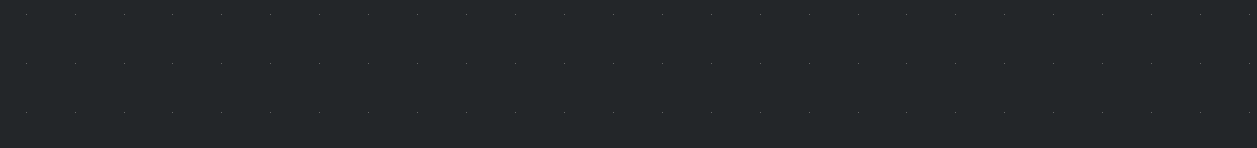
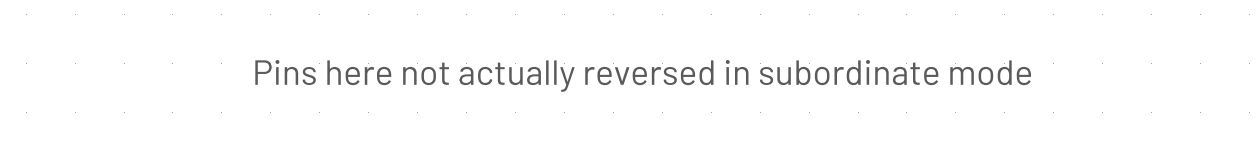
text: none -> Pins here not actually reversed in subordinate mode (643, 75)

